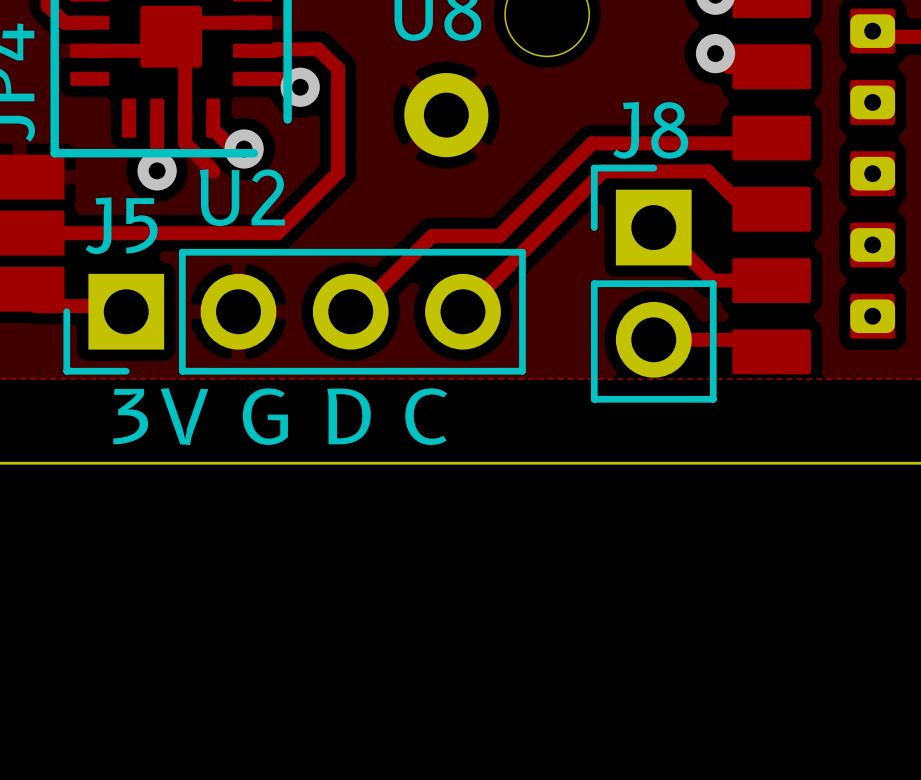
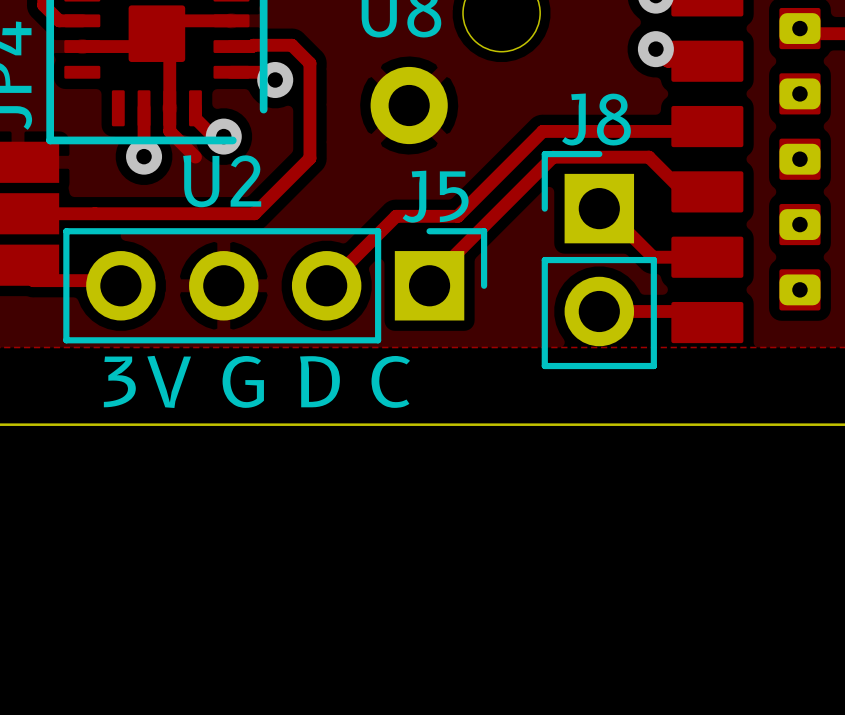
J5 name position: J5 (121, 225) -> J5 (435, 196)
J5 rotation: 0° (294, 311) -> 180° (275, 285)

